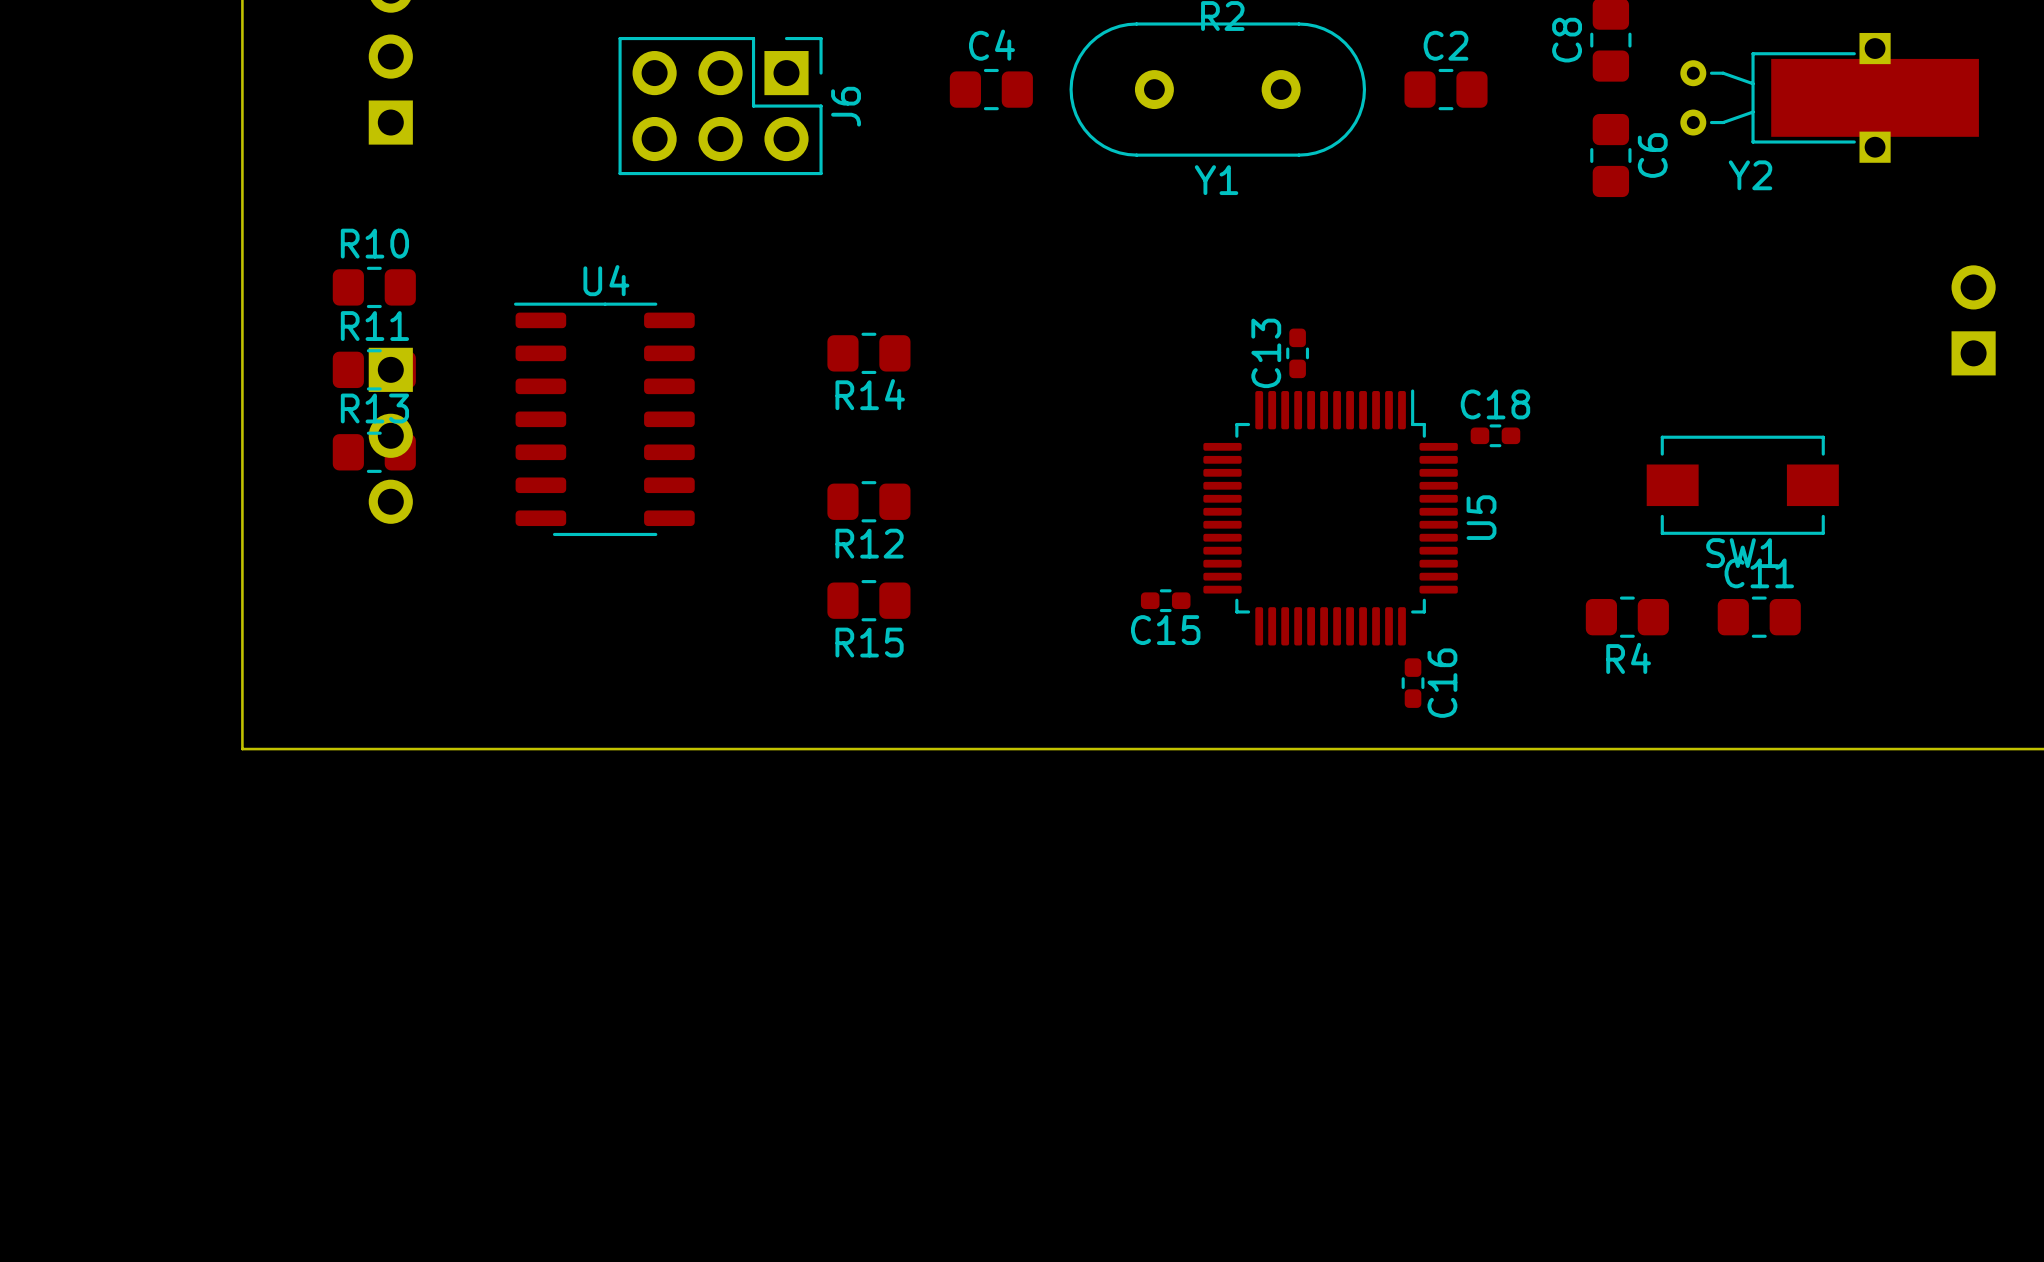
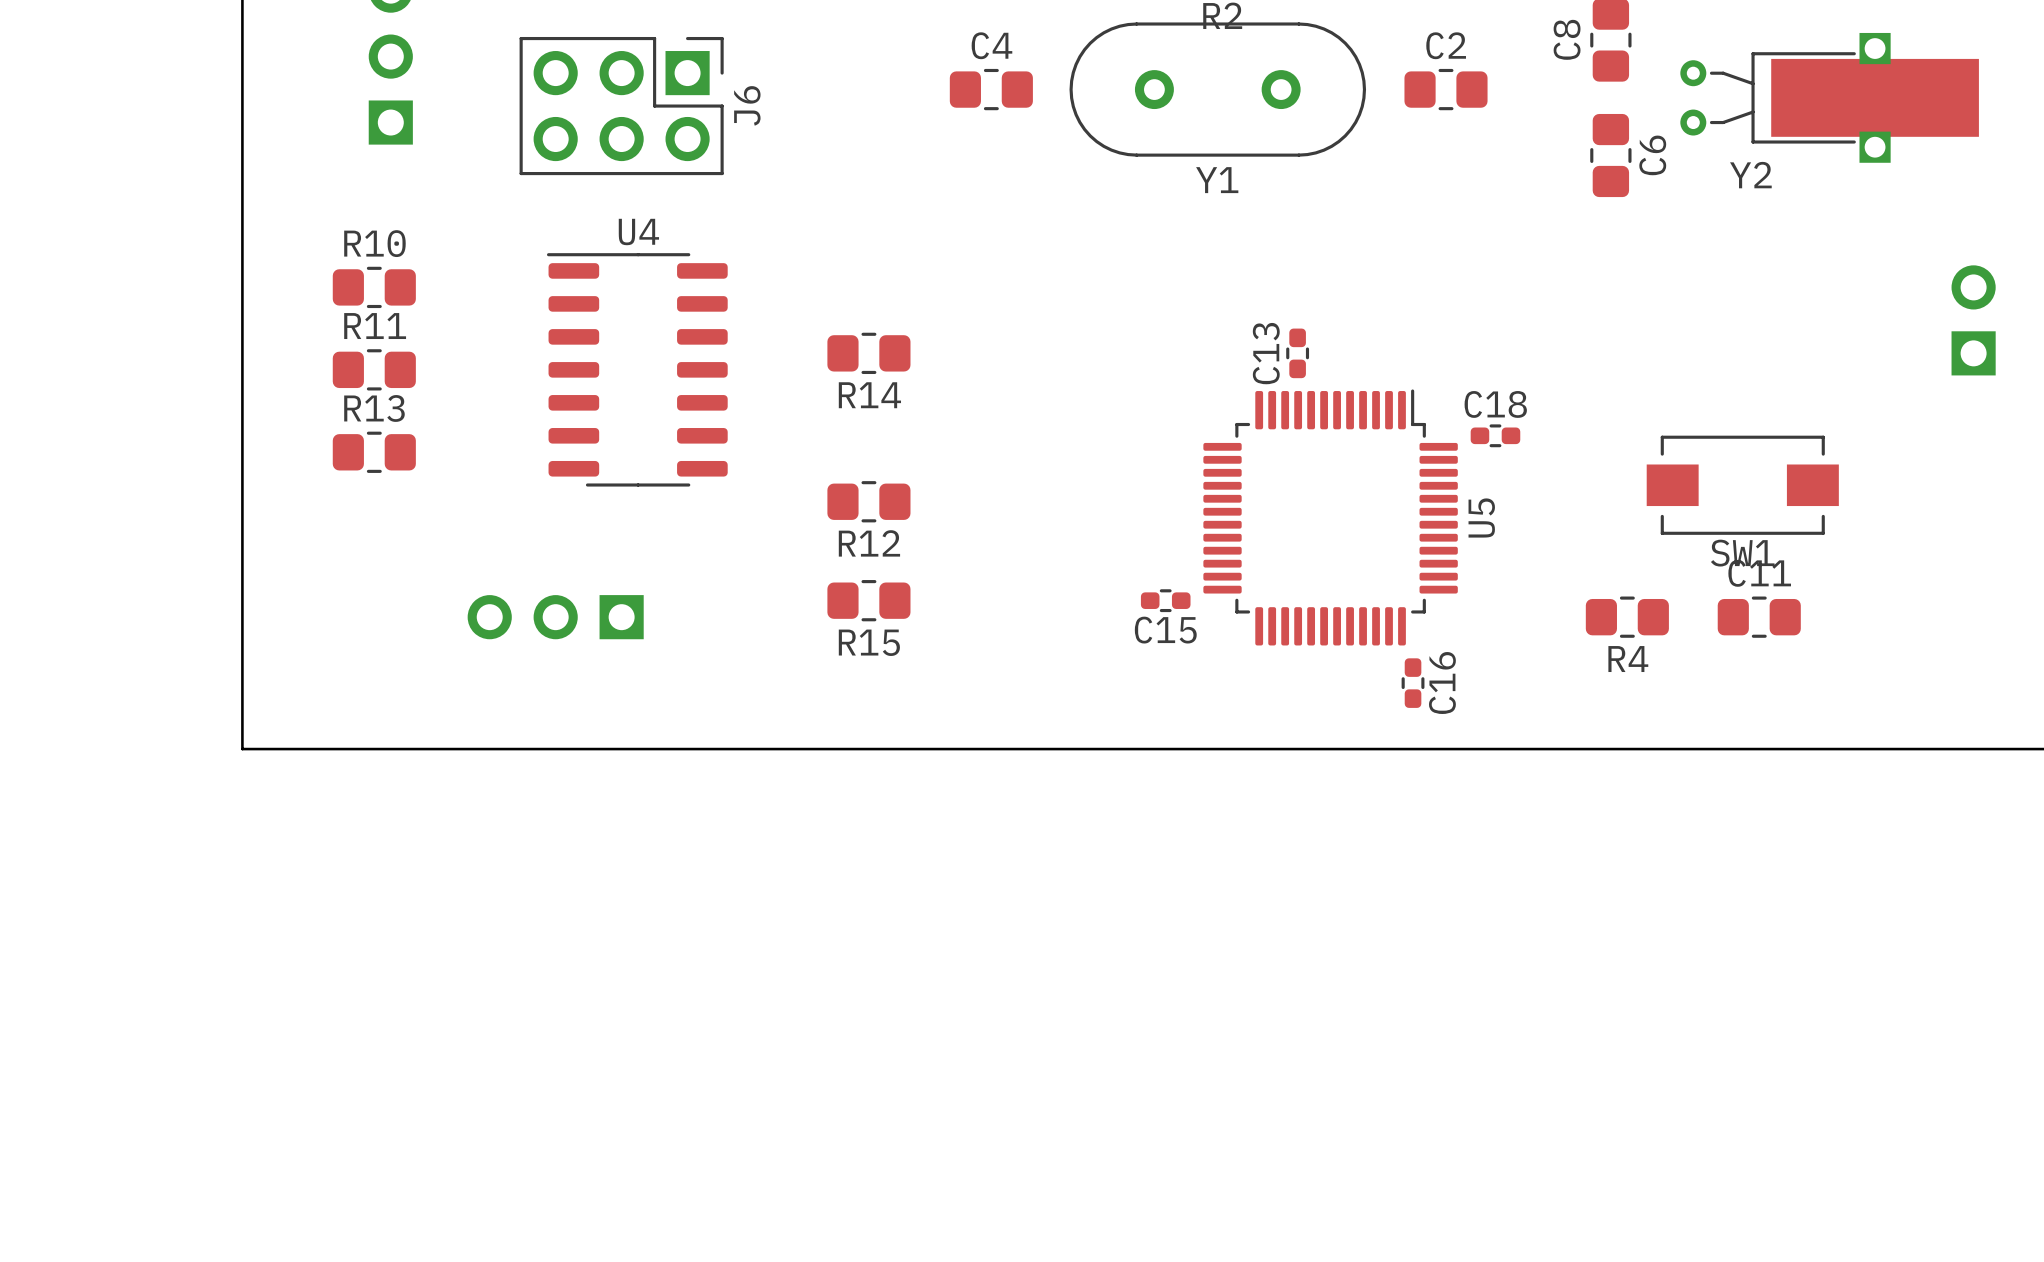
J6 position: (720, 106) -> (621, 106)
U4 position: (604, 419) -> (637, 369)
part rotation: 0° (390, 435) -> 90° clockwise (555, 617)
part position: (390, 435) -> (555, 617)

